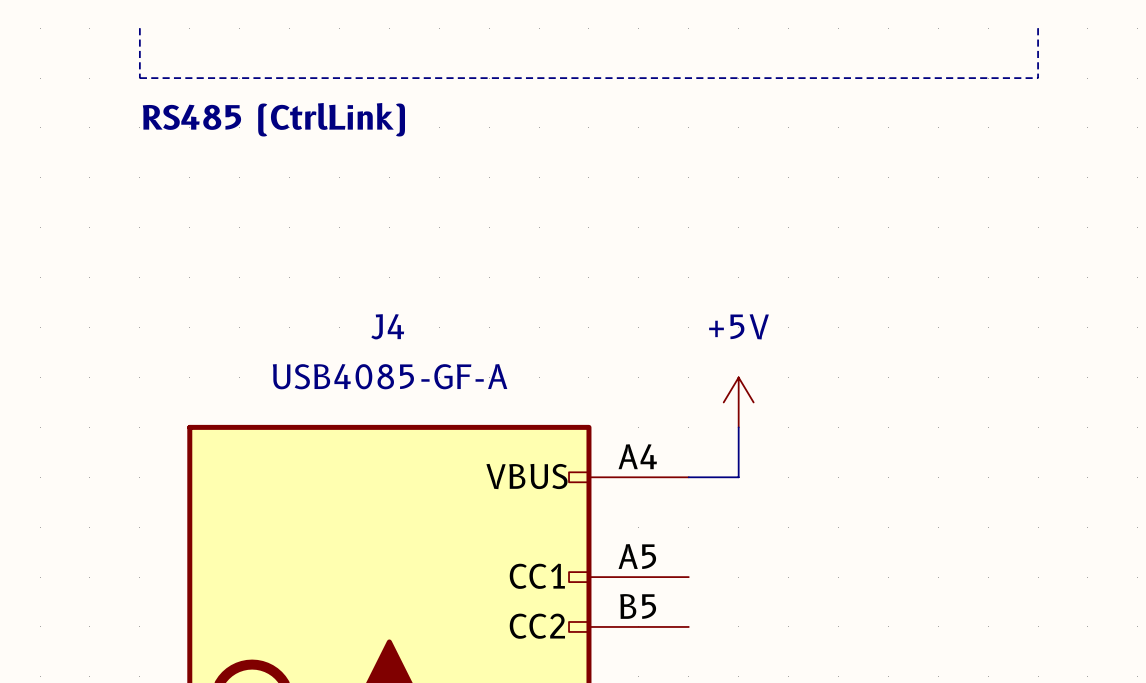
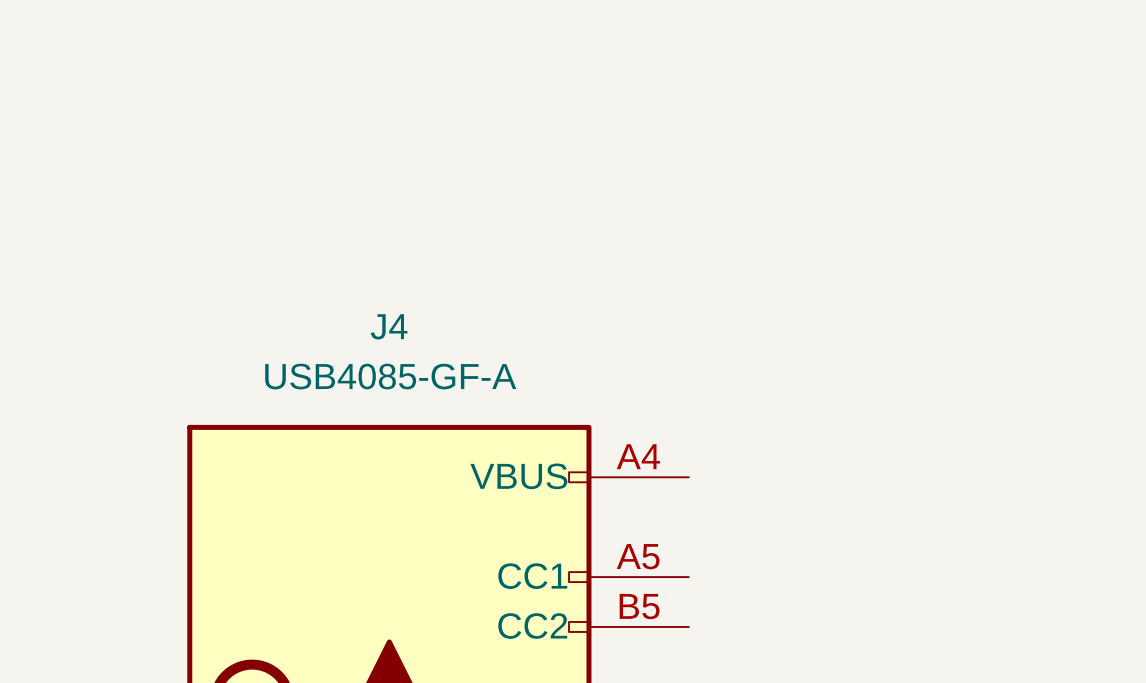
line: (139, 28) (139, 78) (1038, 78) (1038, 28) -> none
text: RS485 (CtrlLink) (273, 119) -> none
power symbol: +5V (738, 402) -> none
wire: (738, 427) (738, 477) (688, 477) -> none

